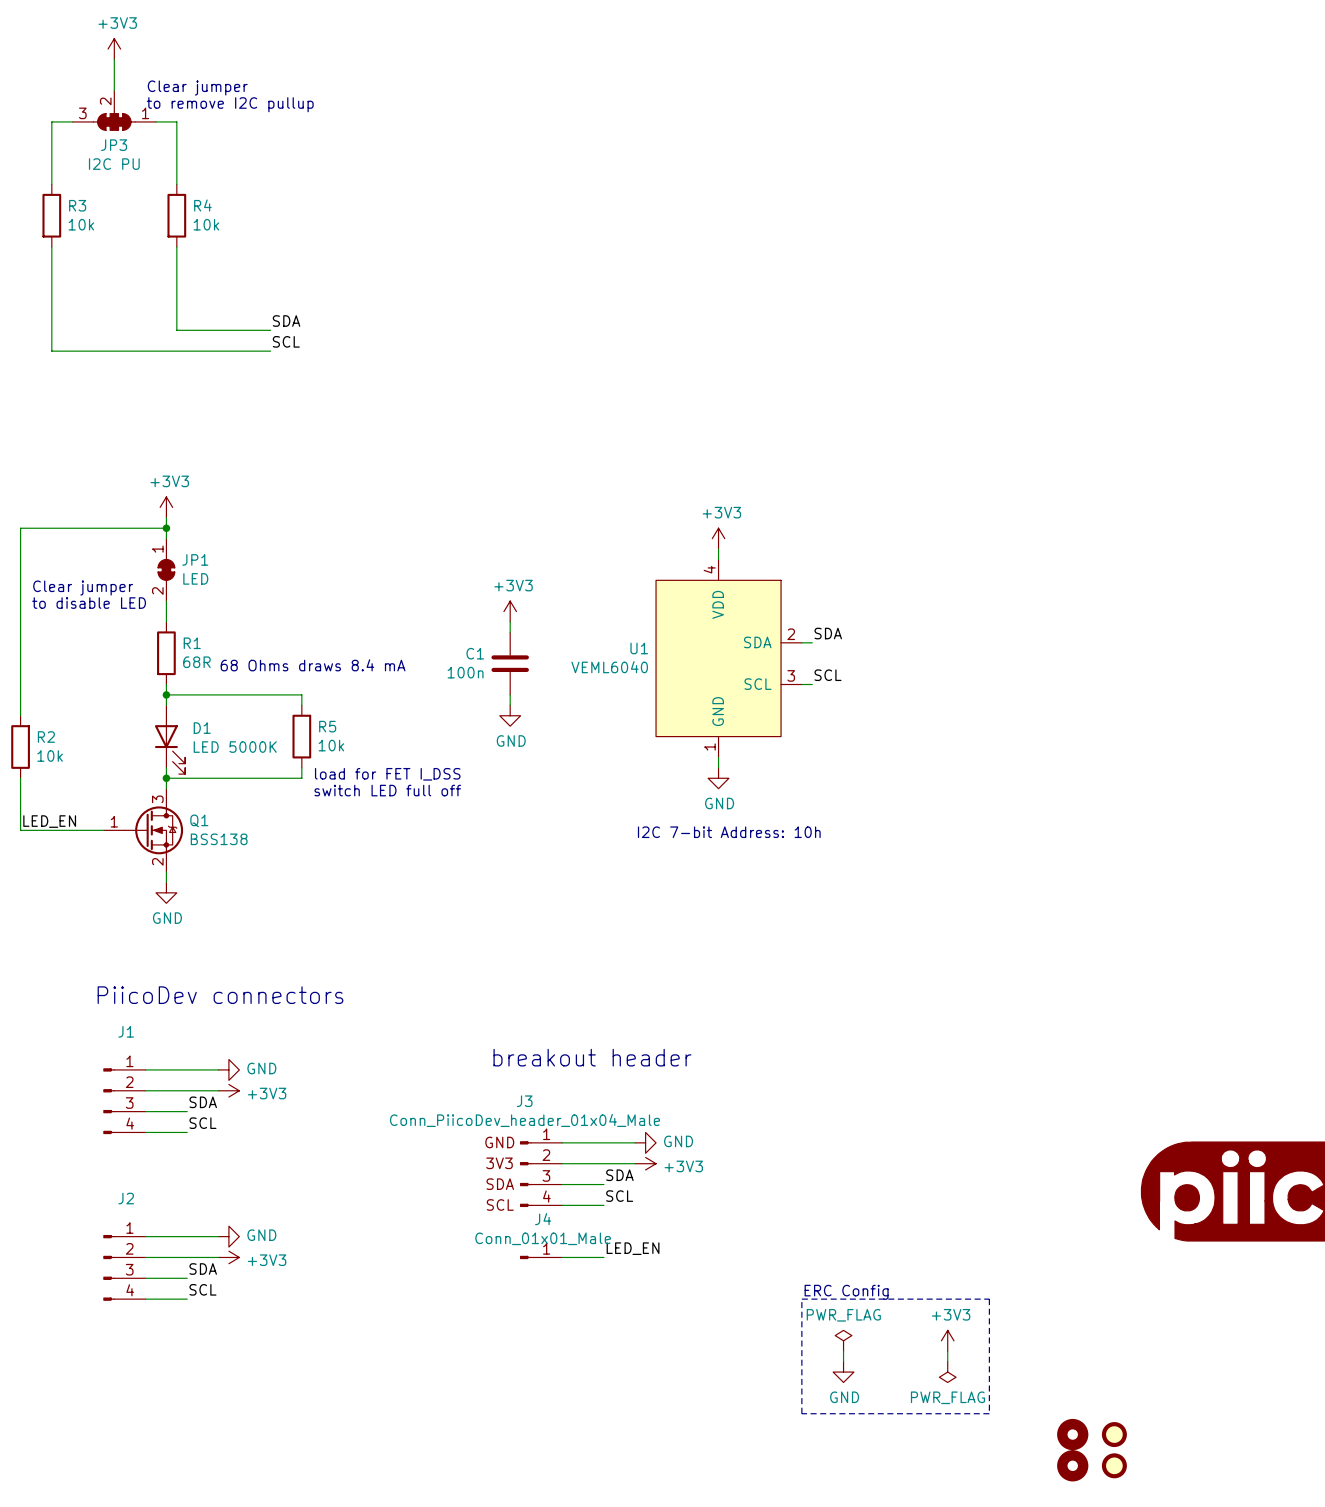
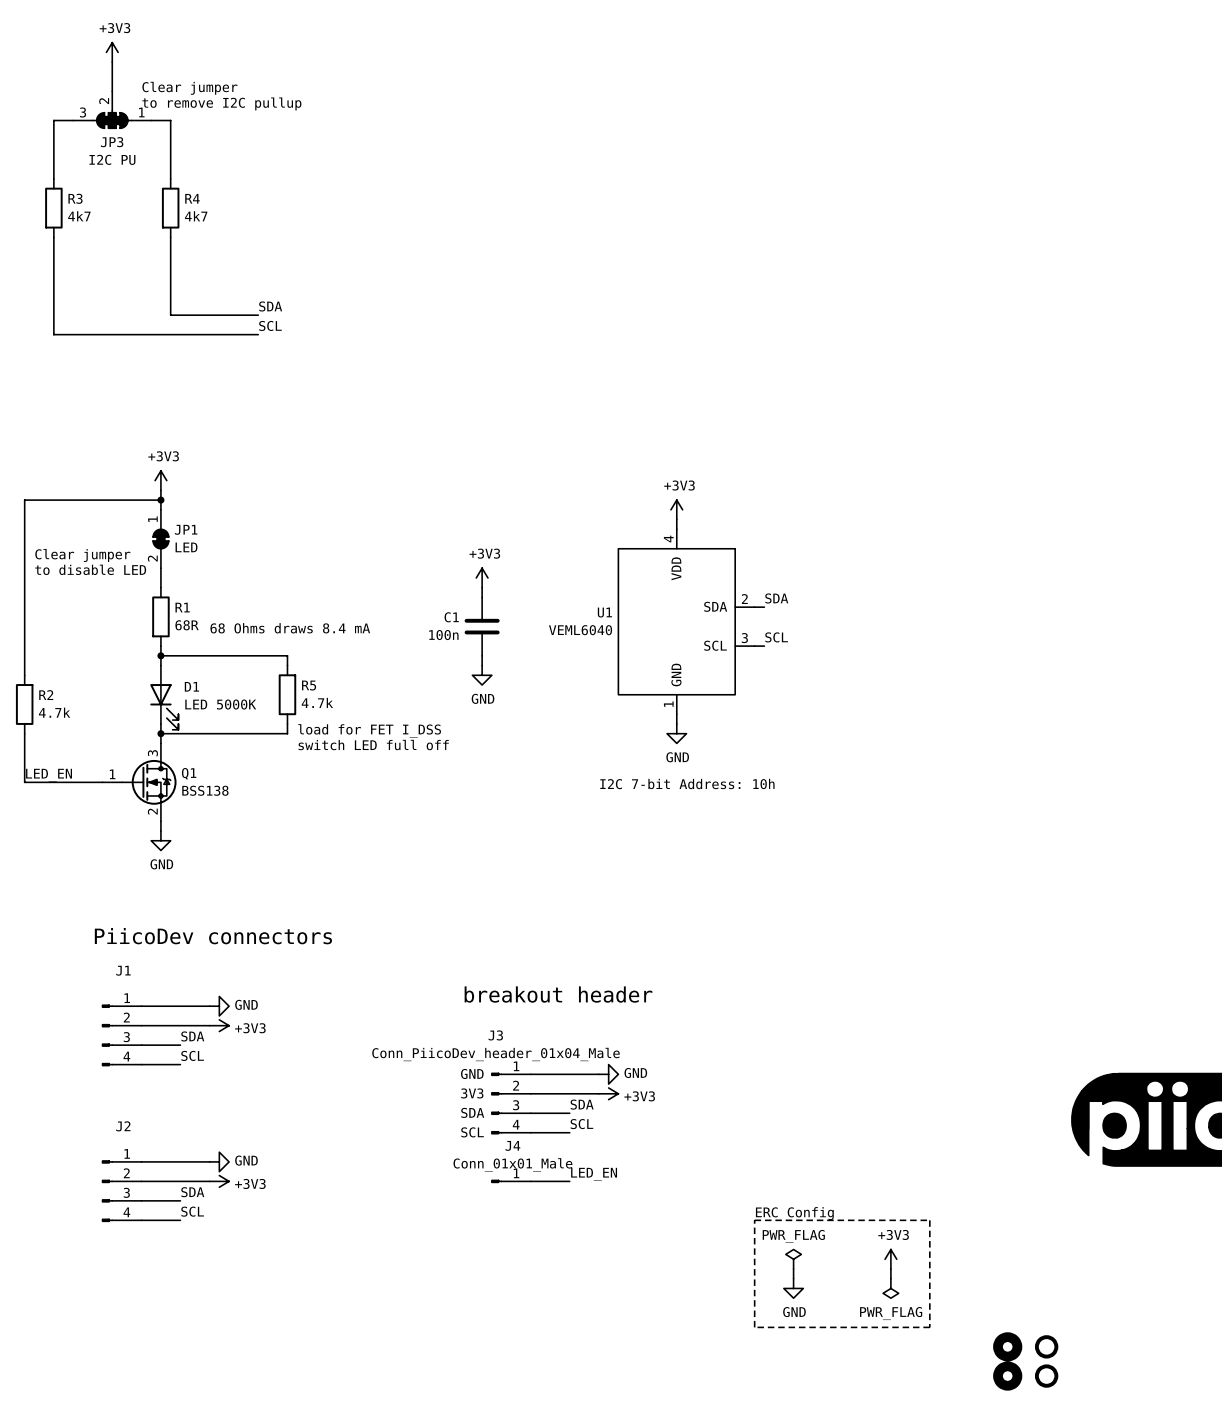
R3 value: 10k (81, 224) -> 4k7 (79, 216)
R4 value: 10k (206, 224) -> 4k7 (196, 216)
R5 value: 10k (331, 745) -> 4.7k (317, 702)
R2 value: 10k (50, 755) -> 4.7k (54, 712)

